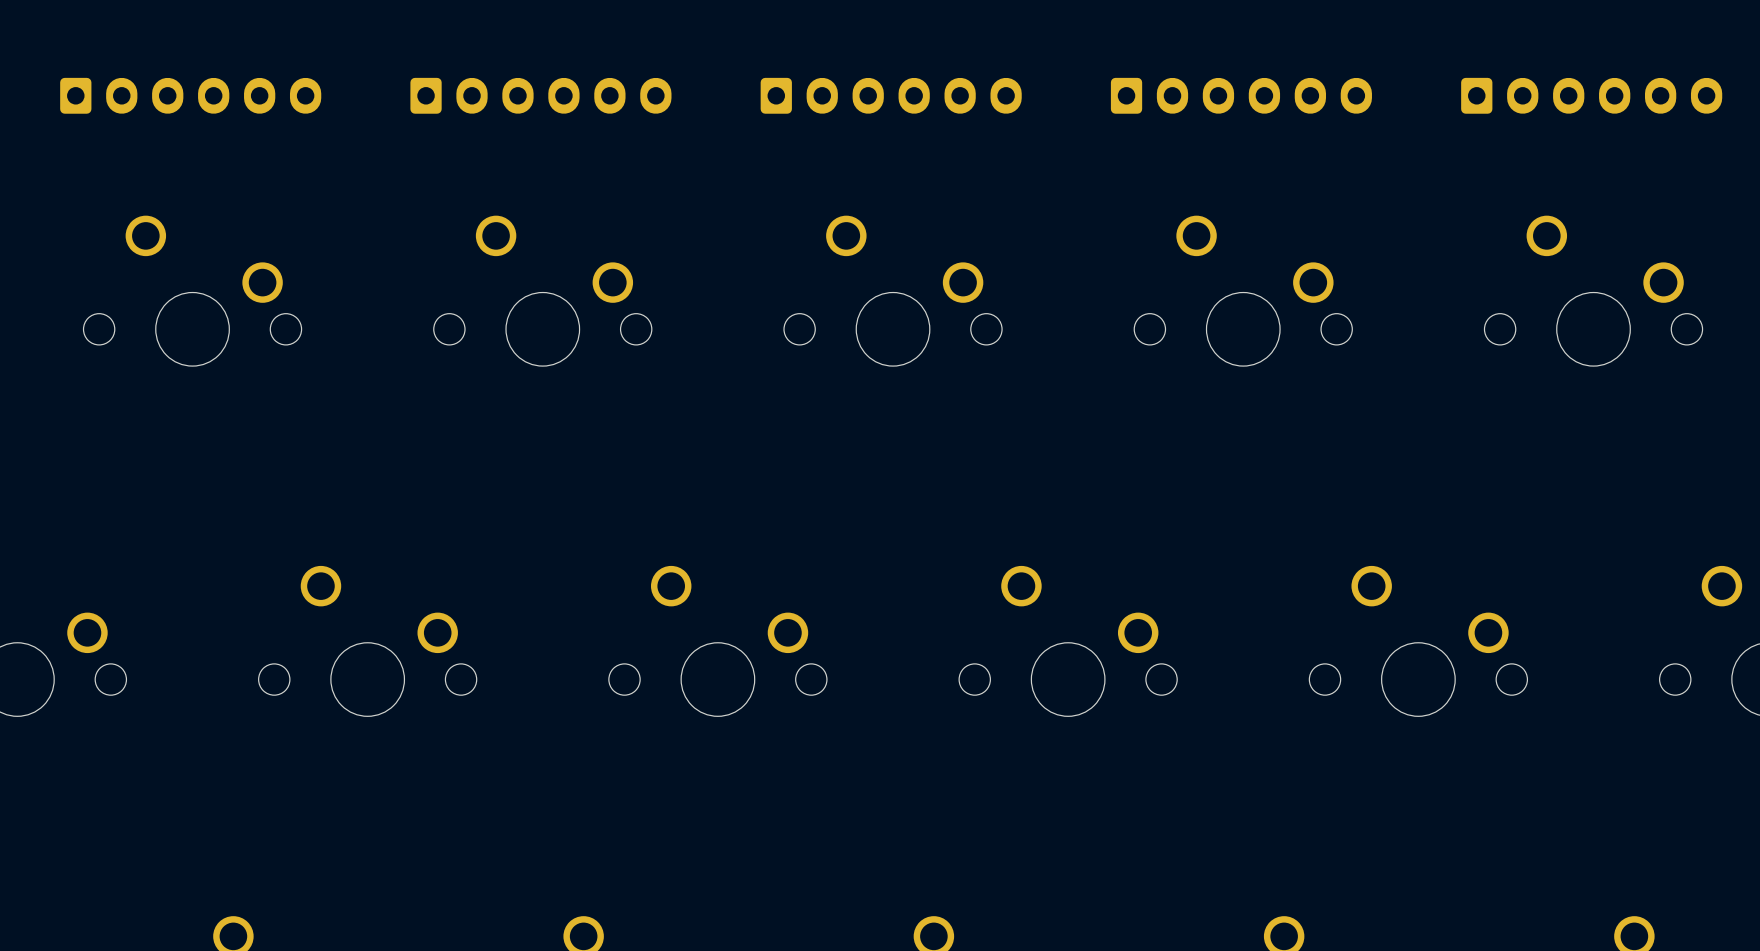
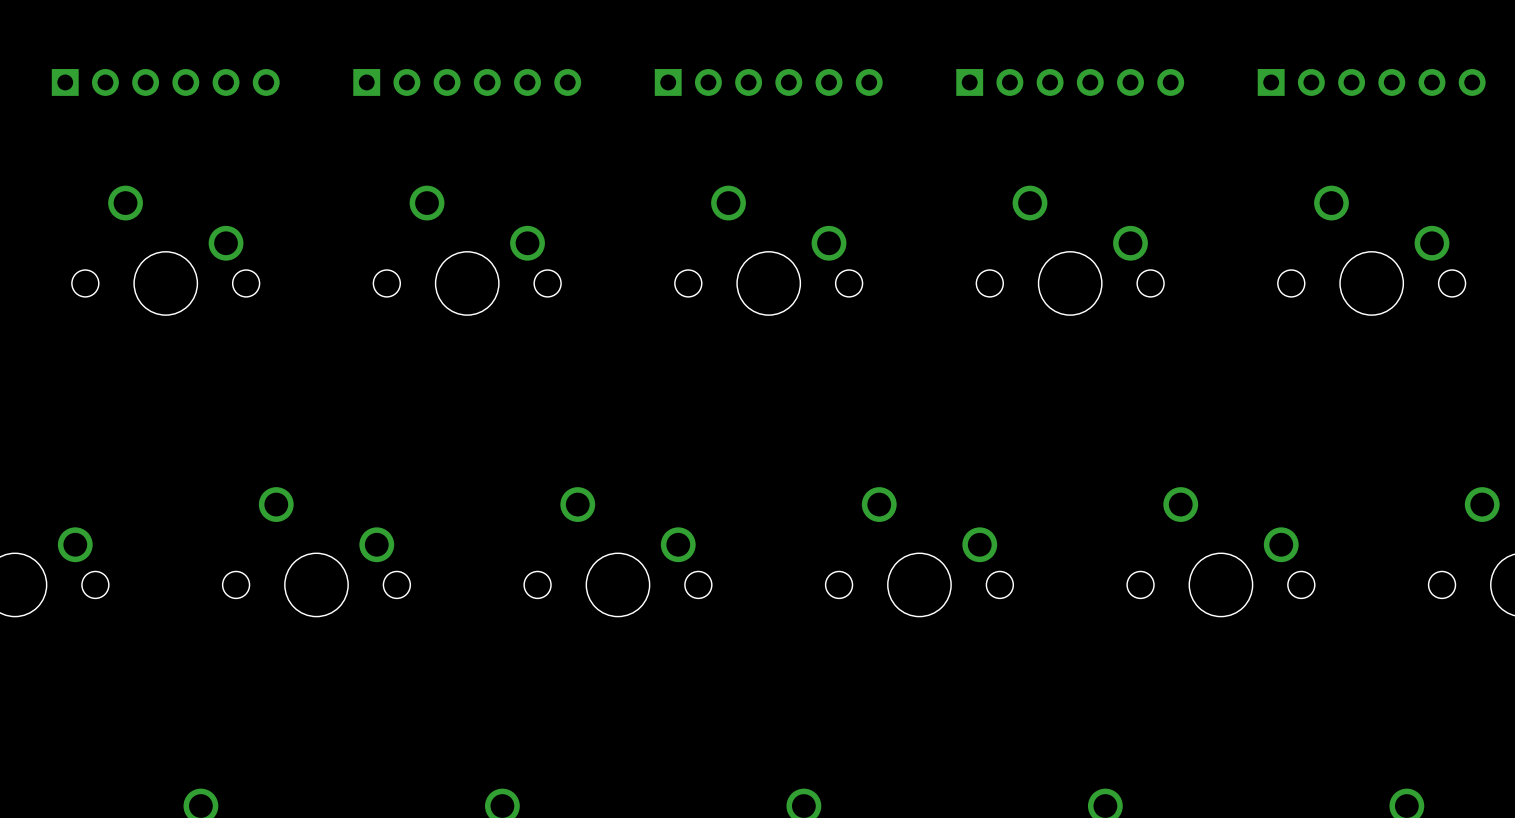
part footprint: [60, 77, 322, 114] -> [51, 69, 280, 96]
part footprint: [410, 77, 672, 114] -> [353, 69, 582, 96]
part footprint: [760, 77, 1022, 114] -> [654, 69, 883, 96]
part footprint: [1110, 77, 1372, 114] -> [956, 69, 1185, 96]
part footprint: [1461, 77, 1723, 114] -> [1257, 69, 1486, 96]

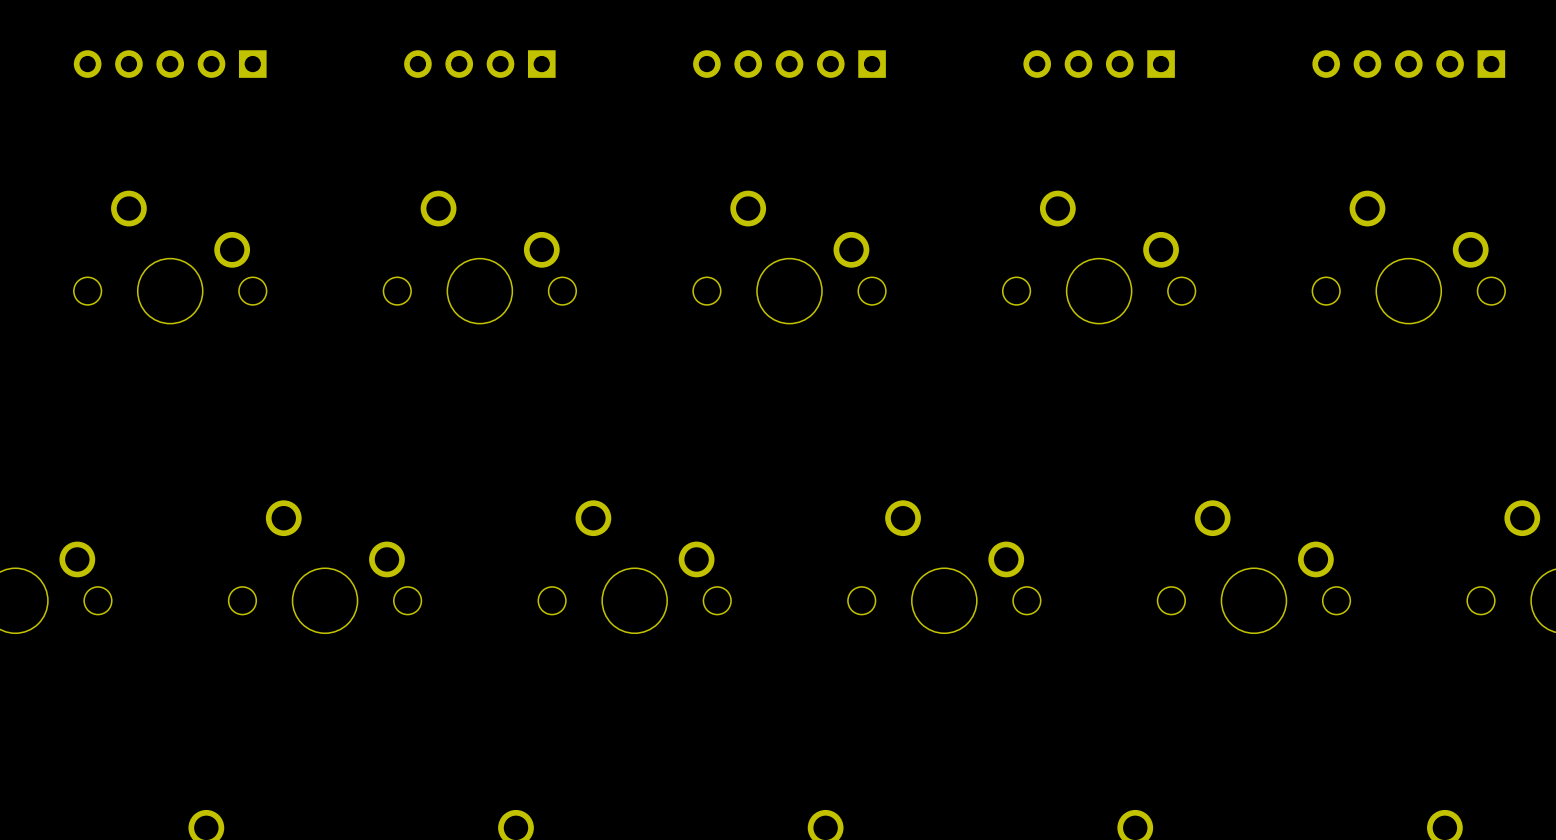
part: none -> (170, 64)
part: none -> (479, 64)
part: none -> (789, 64)
part: none -> (1099, 64)
part: none -> (1408, 64)
part: (165, 82) -> none
part: (467, 82) -> none
part: (768, 82) -> none
part: (1070, 82) -> none
part: (1371, 82) -> none

